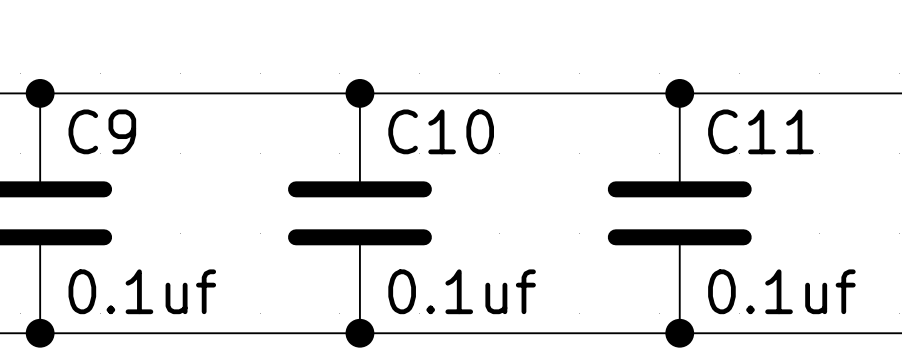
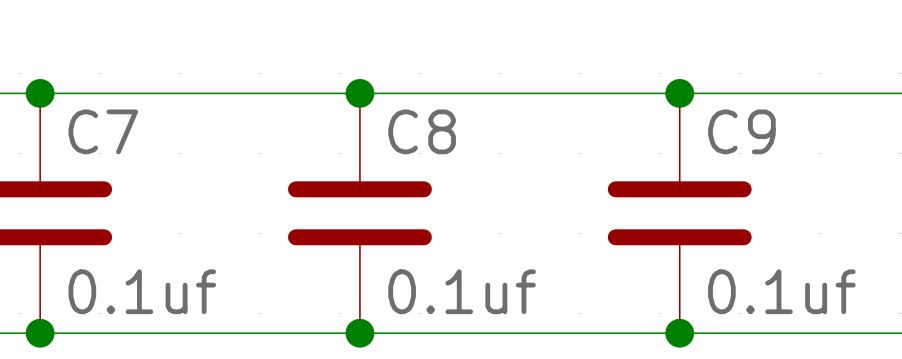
C9 name: C9 (102, 131) -> C7 (103, 131)
C10 name: C10 (441, 131) -> C8 (422, 131)
C11 name: C11 (760, 131) -> C9 (741, 131)

